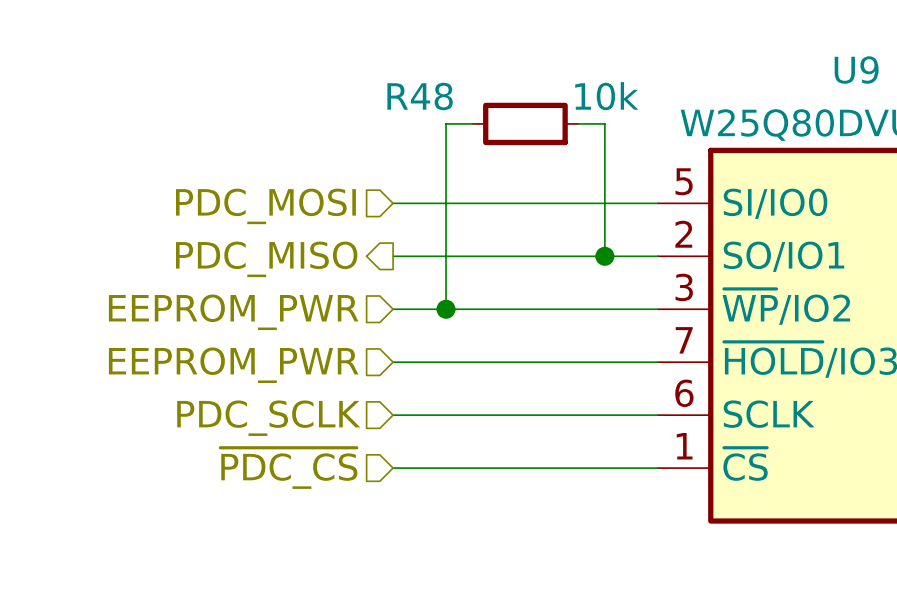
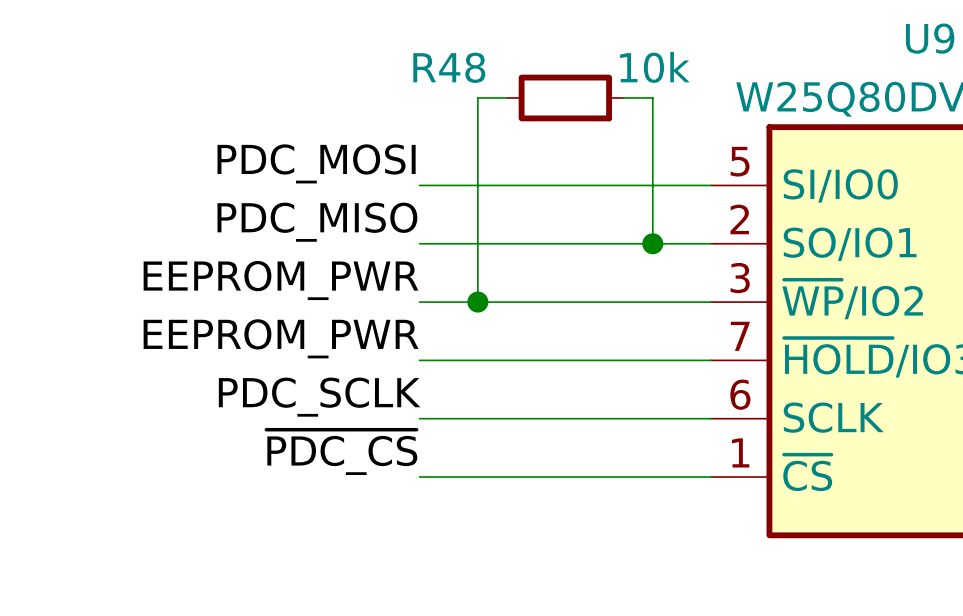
label: none -> PDC_MOSI (316, 163)
hierarchical label: PDC_MOSI (265, 206) -> none
label: none -> PDC_MISO (317, 222)
hierarchical label: PDC_MISO (266, 259) -> none
label: none -> EEPROM_PWR (281, 280)
hierarchical label: EEPROM_PWR (233, 312) -> none
label: none -> EEPROM_PWR (281, 338)
hierarchical label: EEPROM_PWR (233, 365) -> none
label: none -> PDC_SCLK (319, 397)
hierarchical label: PDC_SCLK (268, 418) -> none
label: none -> ~{PDC_CS} (341, 452)
hierarchical label: ~{PDC_CS} (288, 468) -> none

